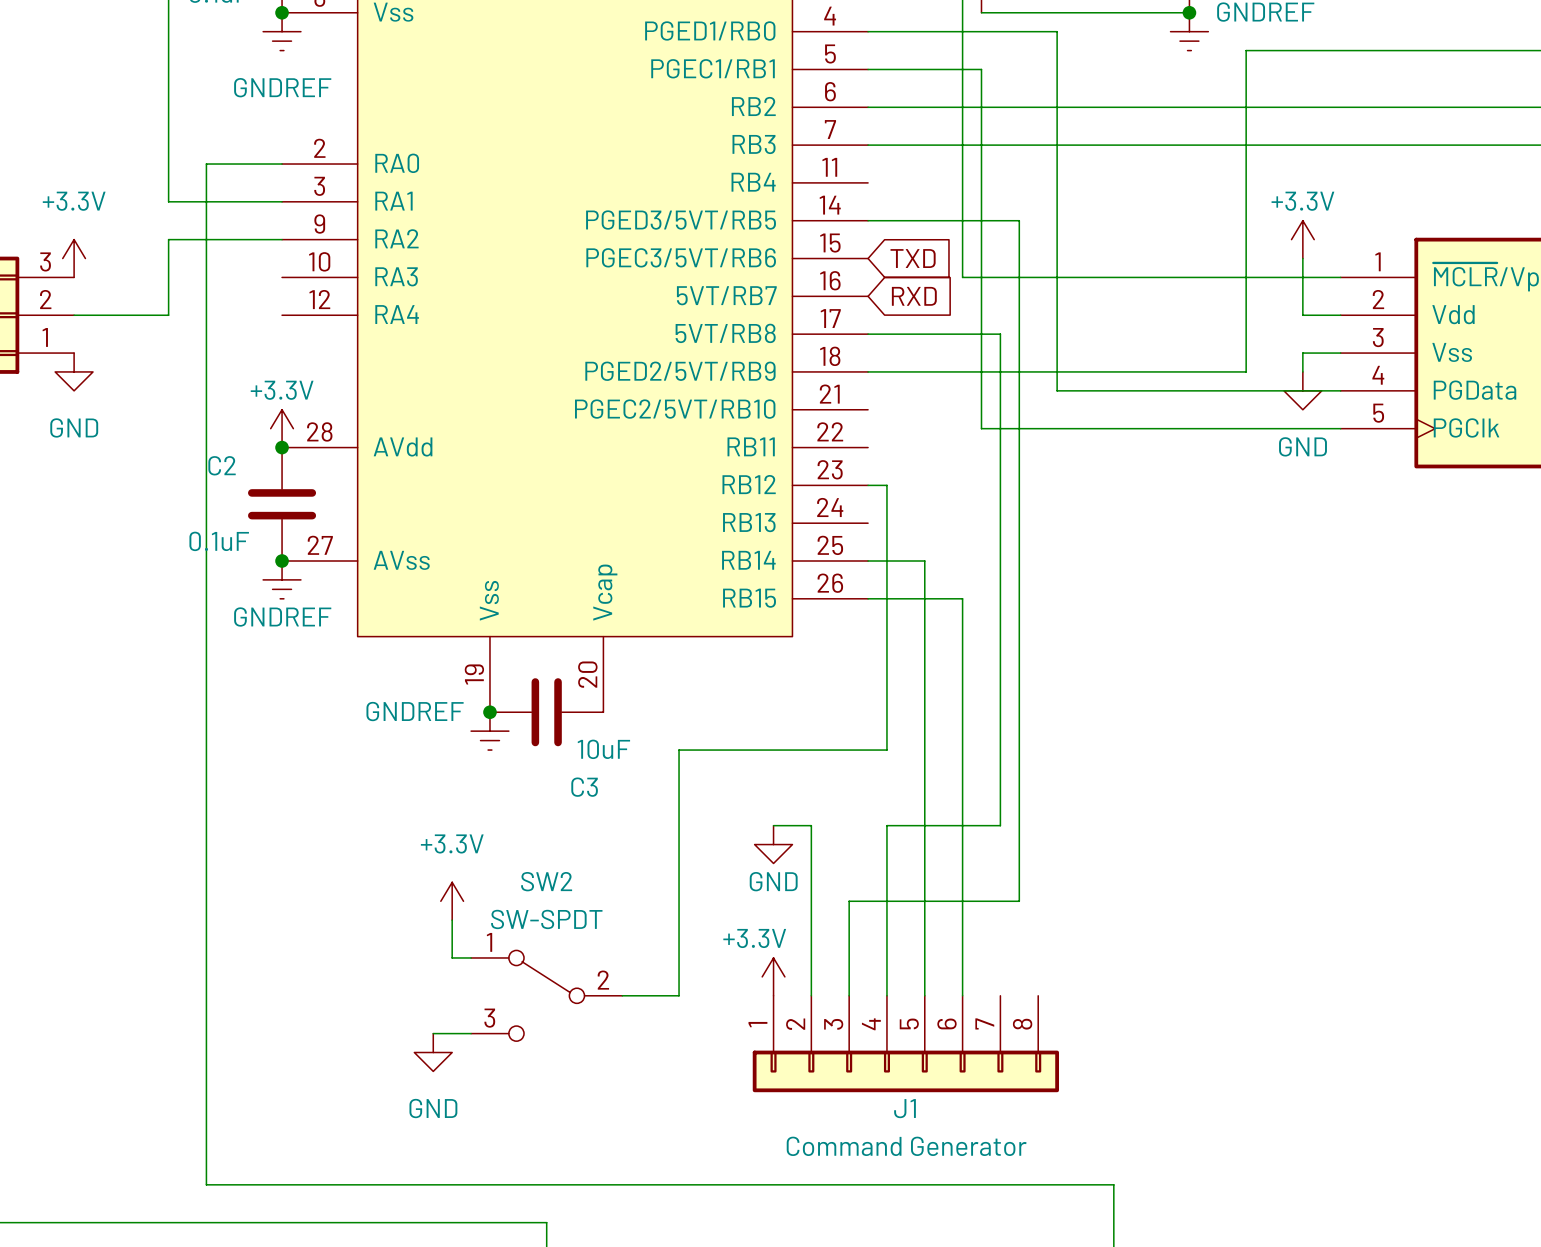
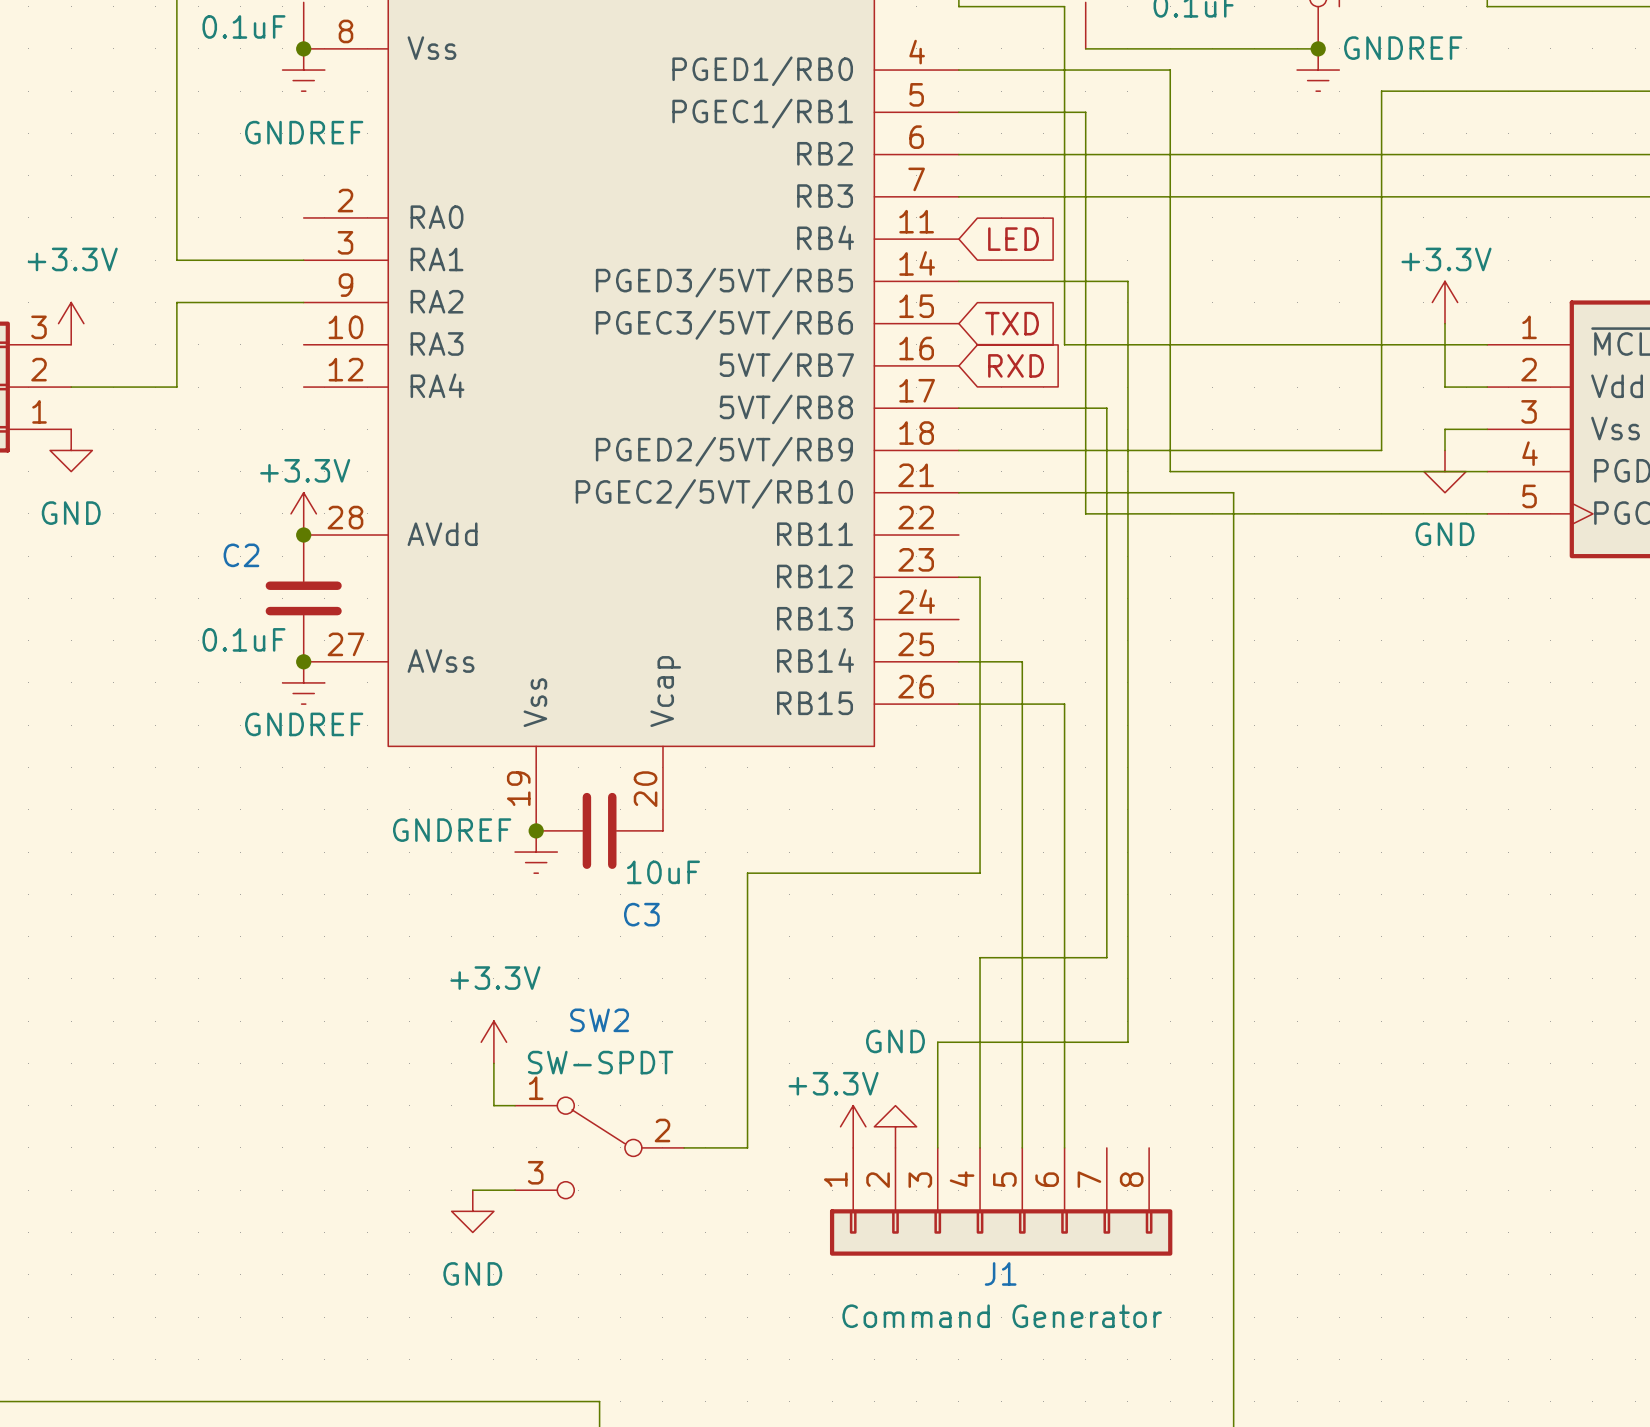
wire: (282, 164) (206, 164) (206, 1184) (1113, 1184) -> (958, 492) (1233, 492) (1233, 1359)
global label: none -> LED (1013, 239)
wire: (773, 825) (811, 825) (811, 995) -> none
power symbol rotation: 0° (773, 844) -> 180° (895, 1126)
power symbol position: GND (773, 844) -> GND (895, 1126)
power symbol text position: GND (773, 881) -> GND (895, 1041)

